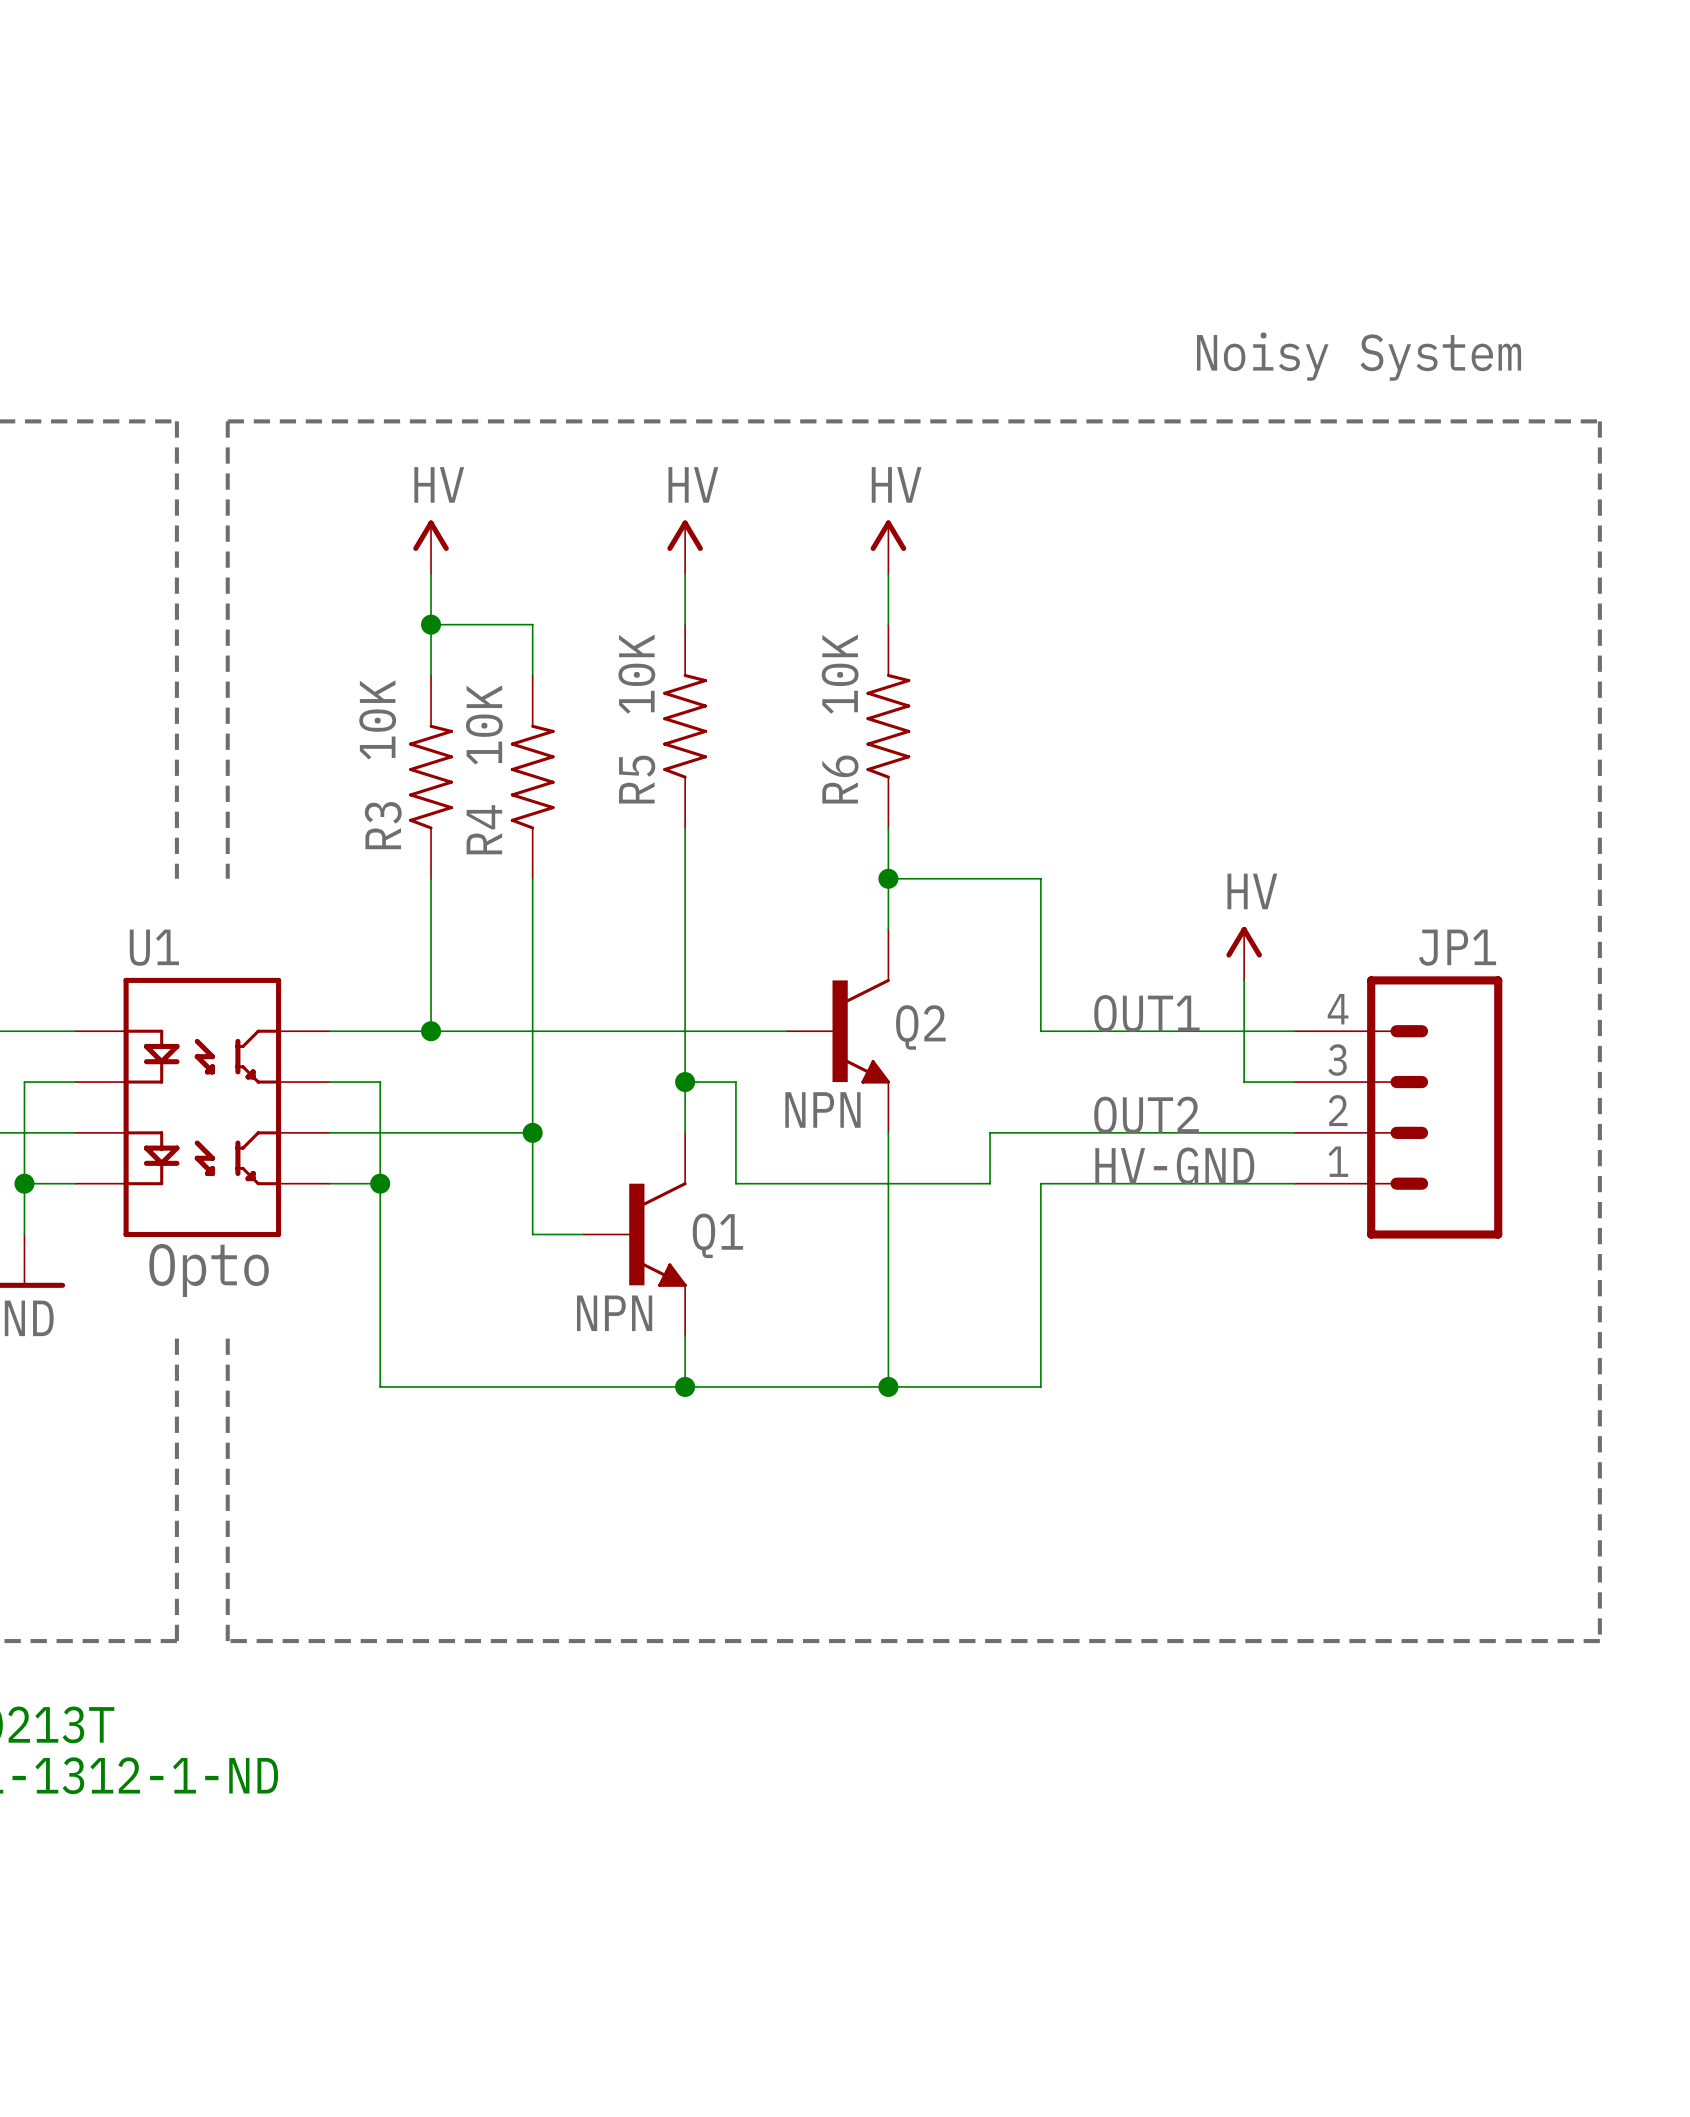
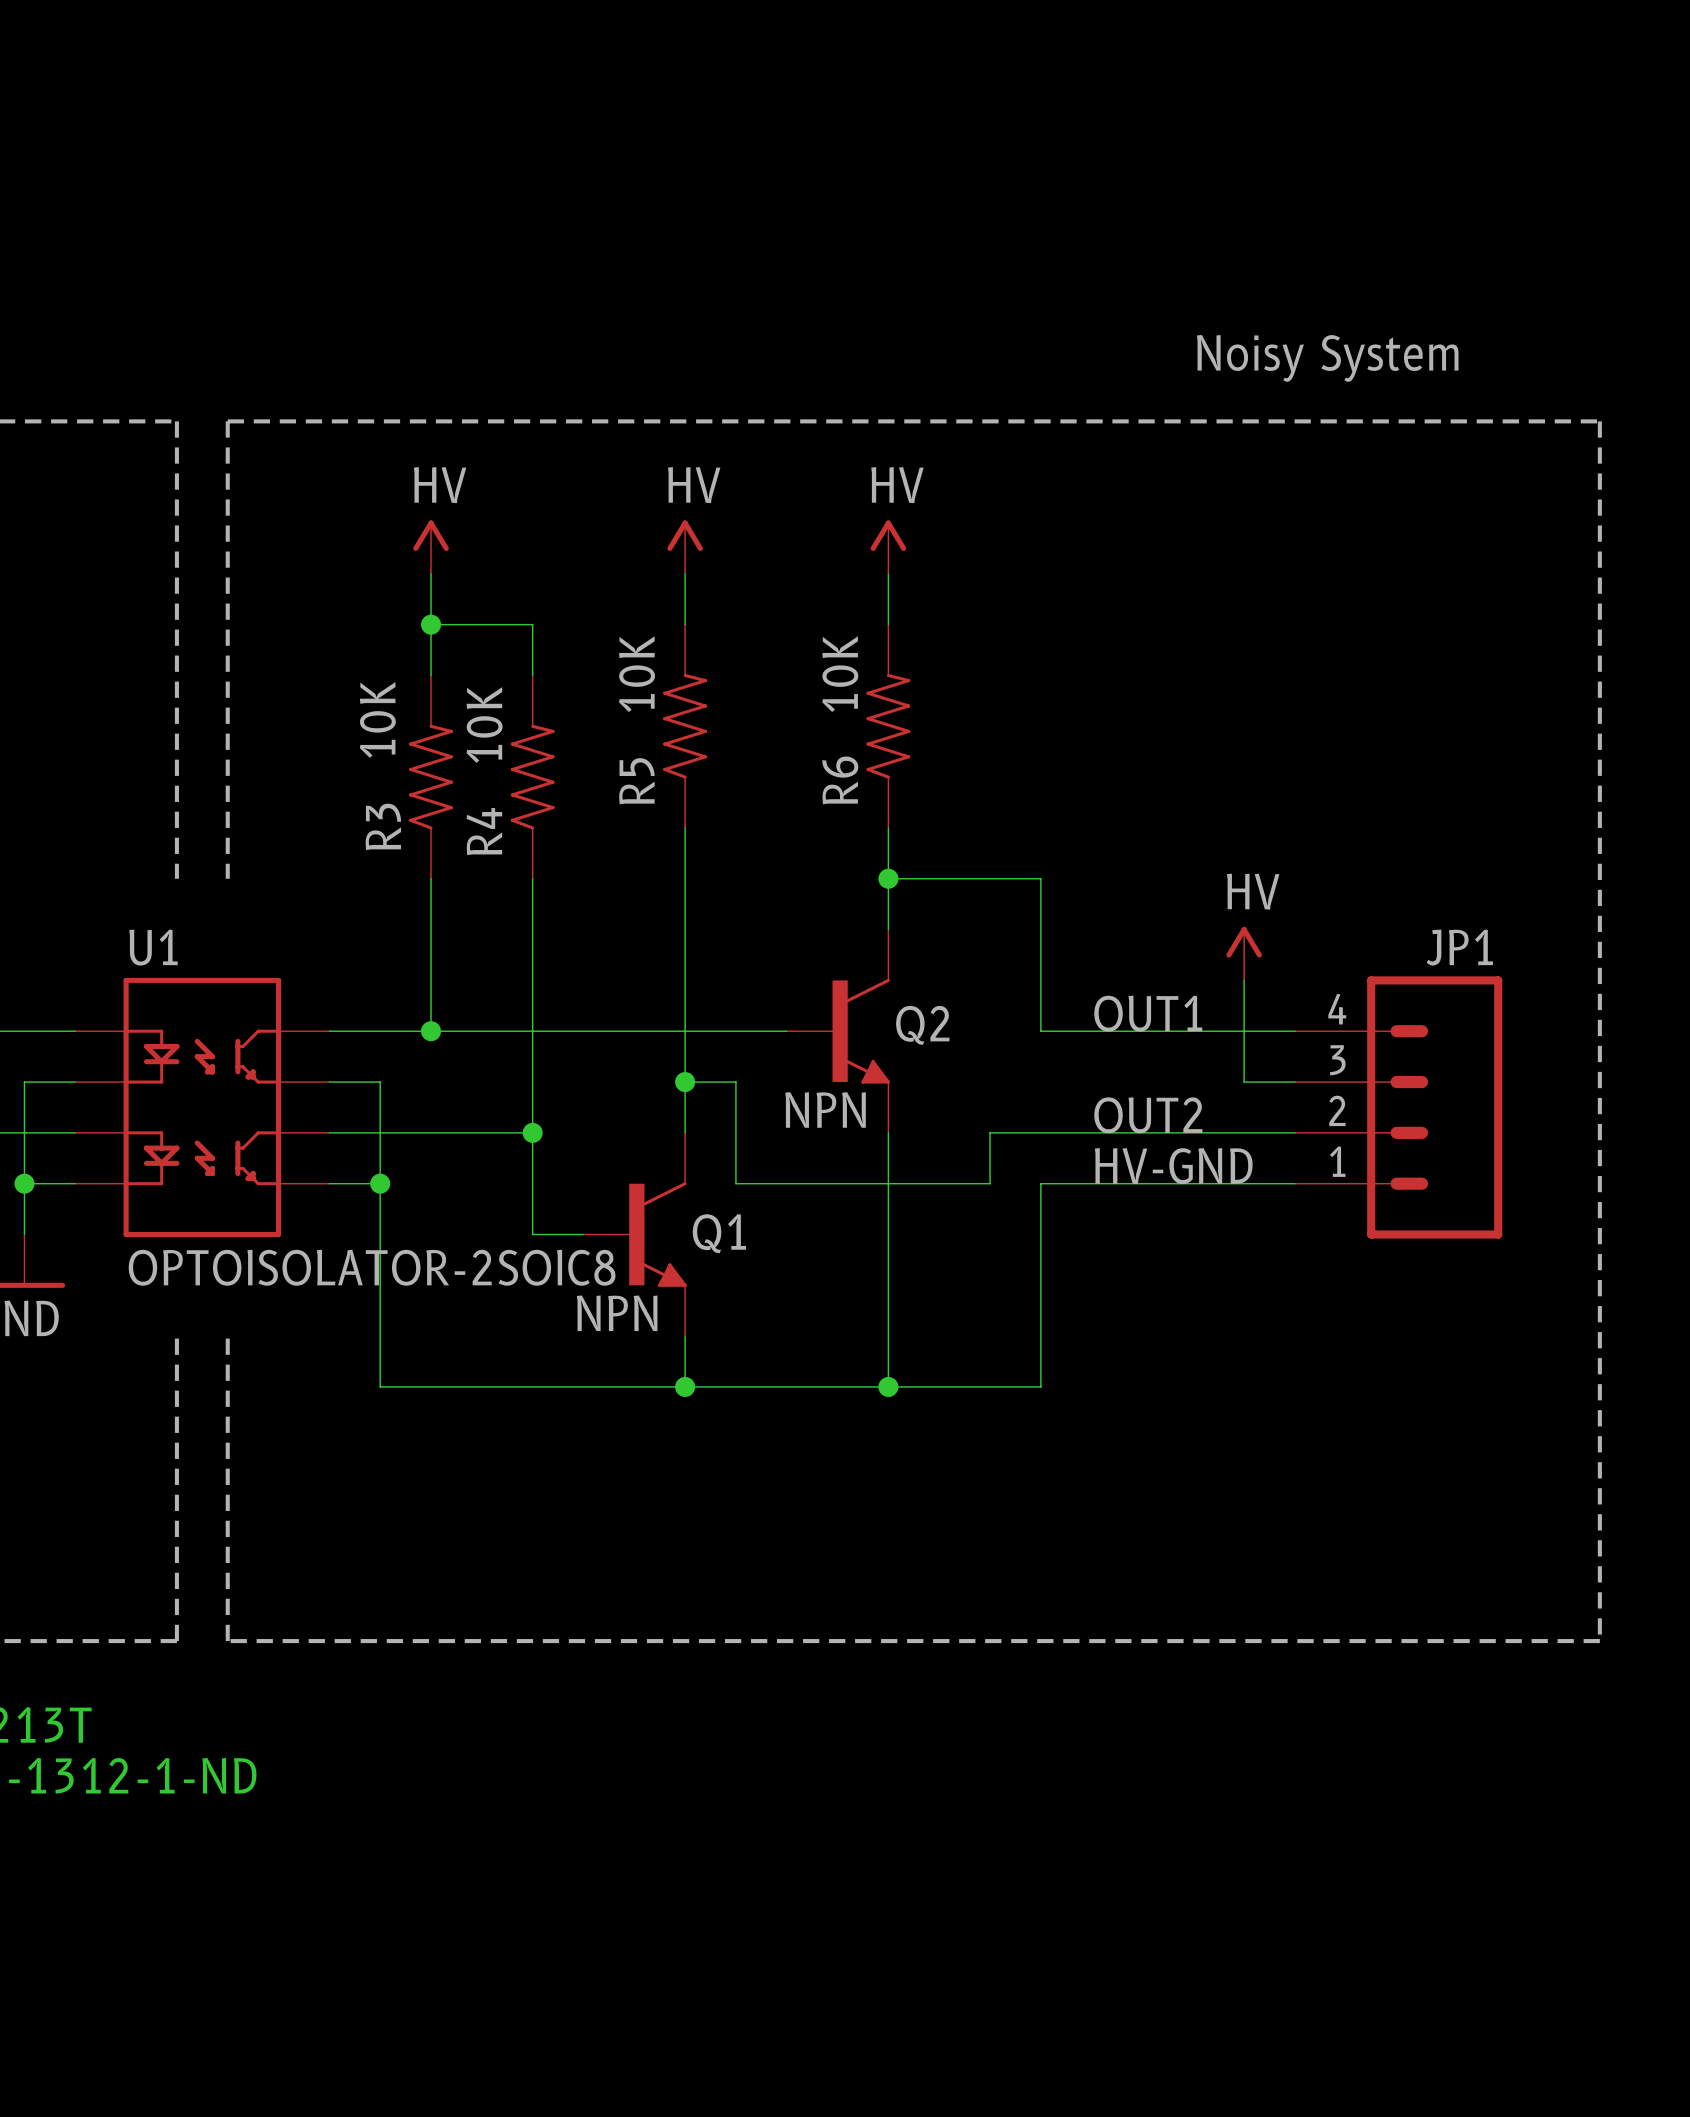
U1 value: none -> OPTOISOLATOR-2SOIC8 (372, 1267)
text: Opto (209, 1270) -> none

